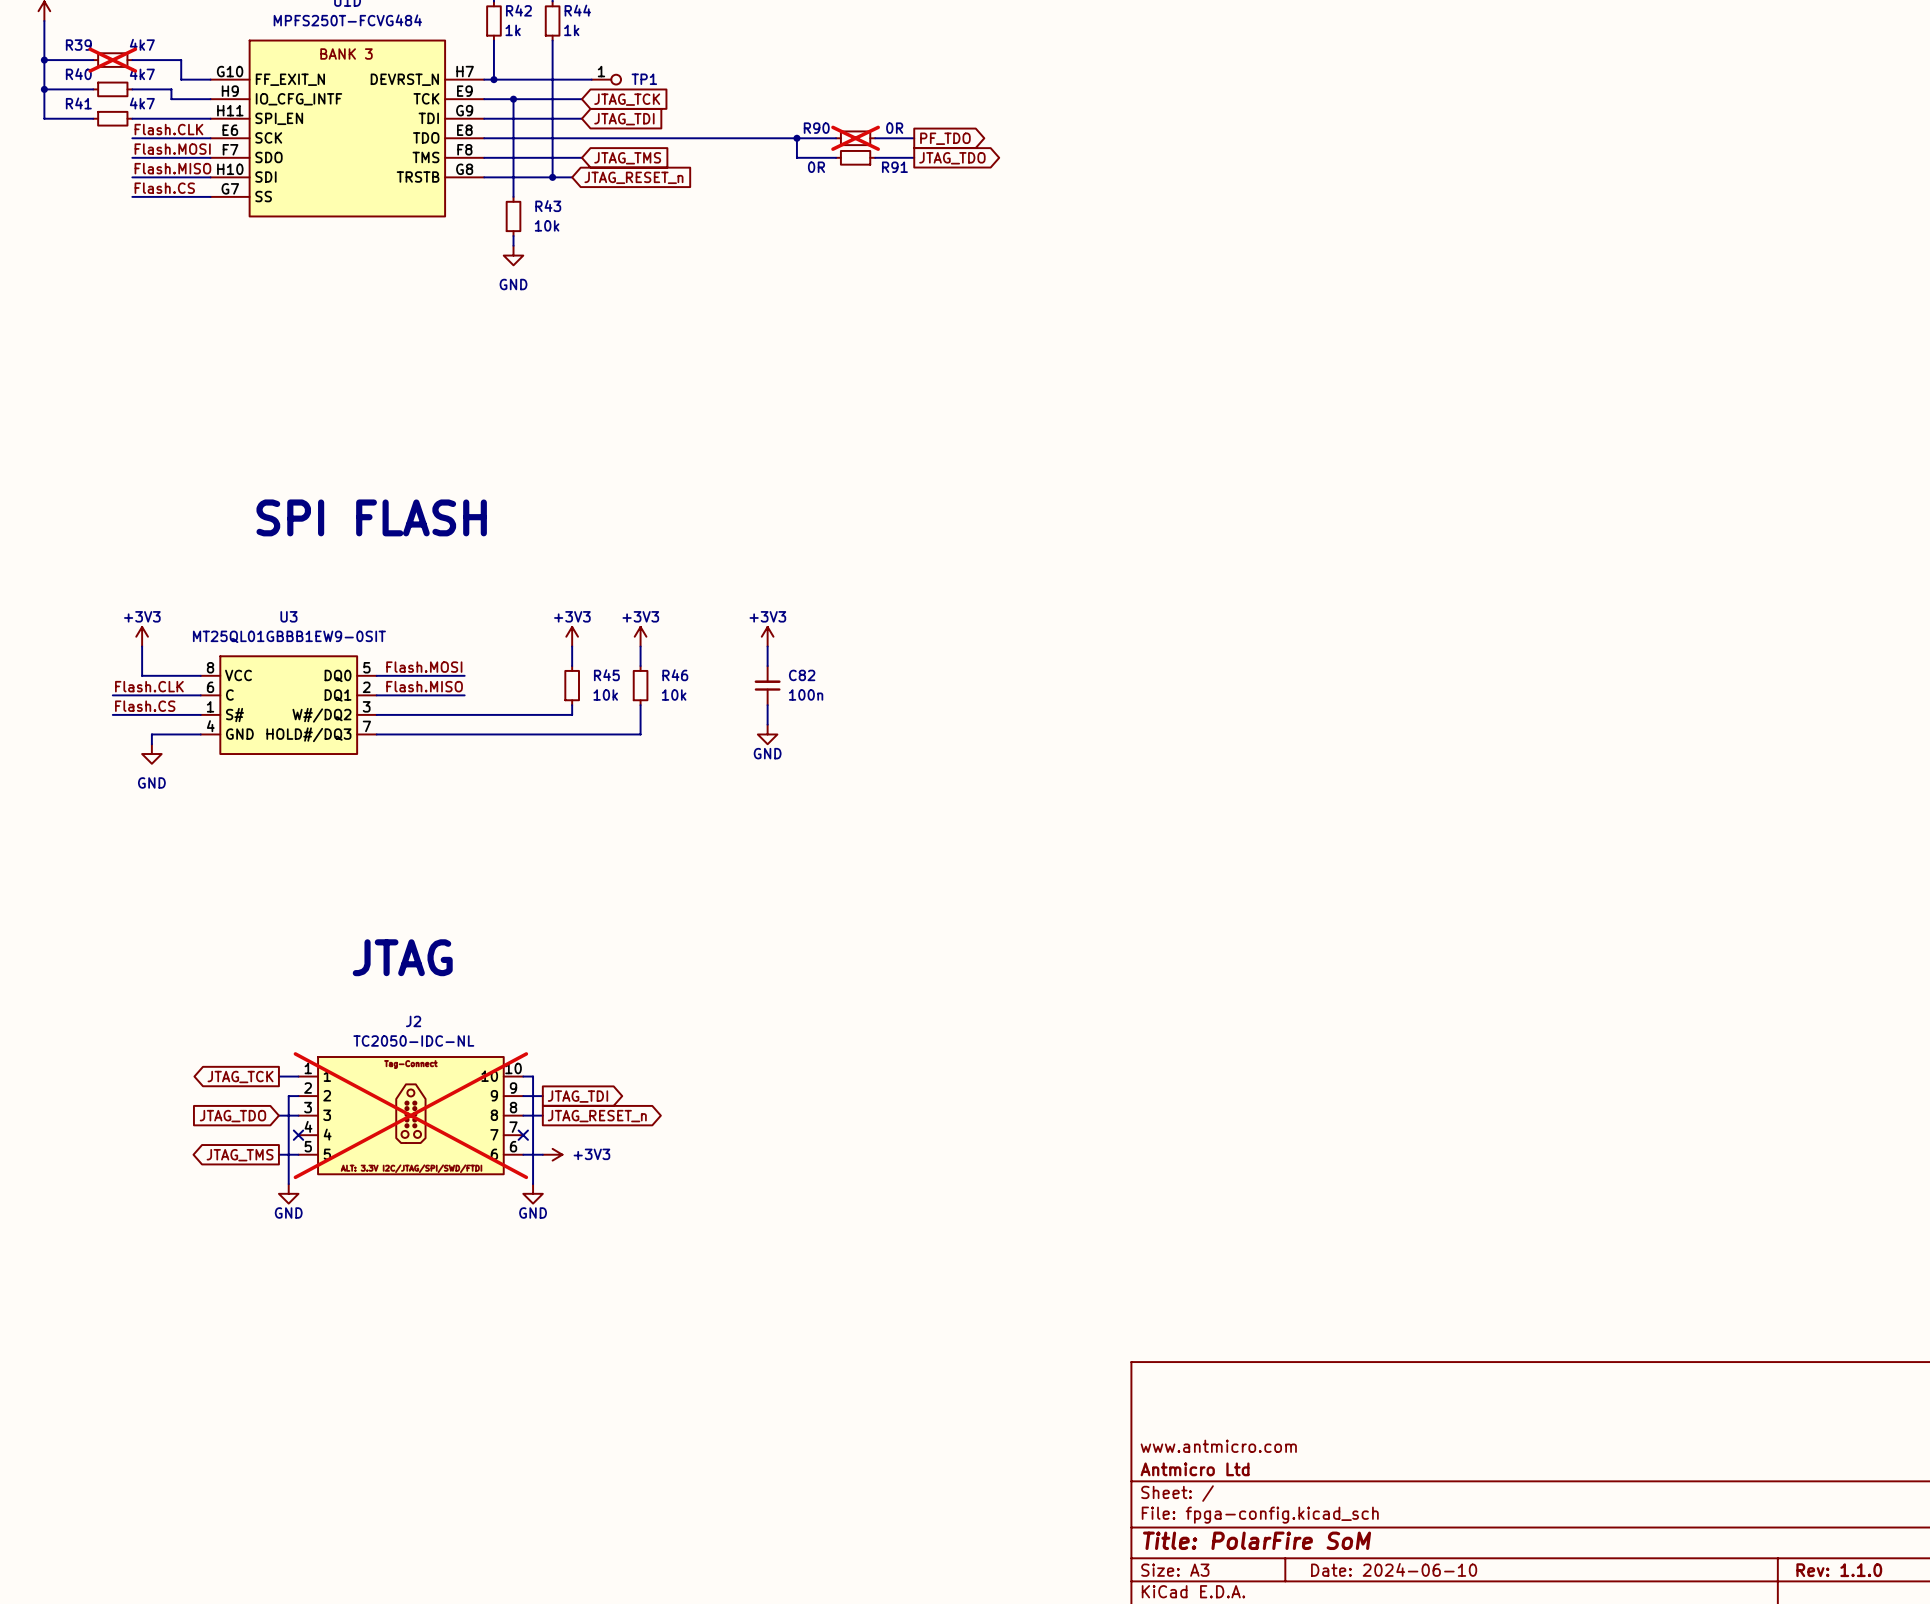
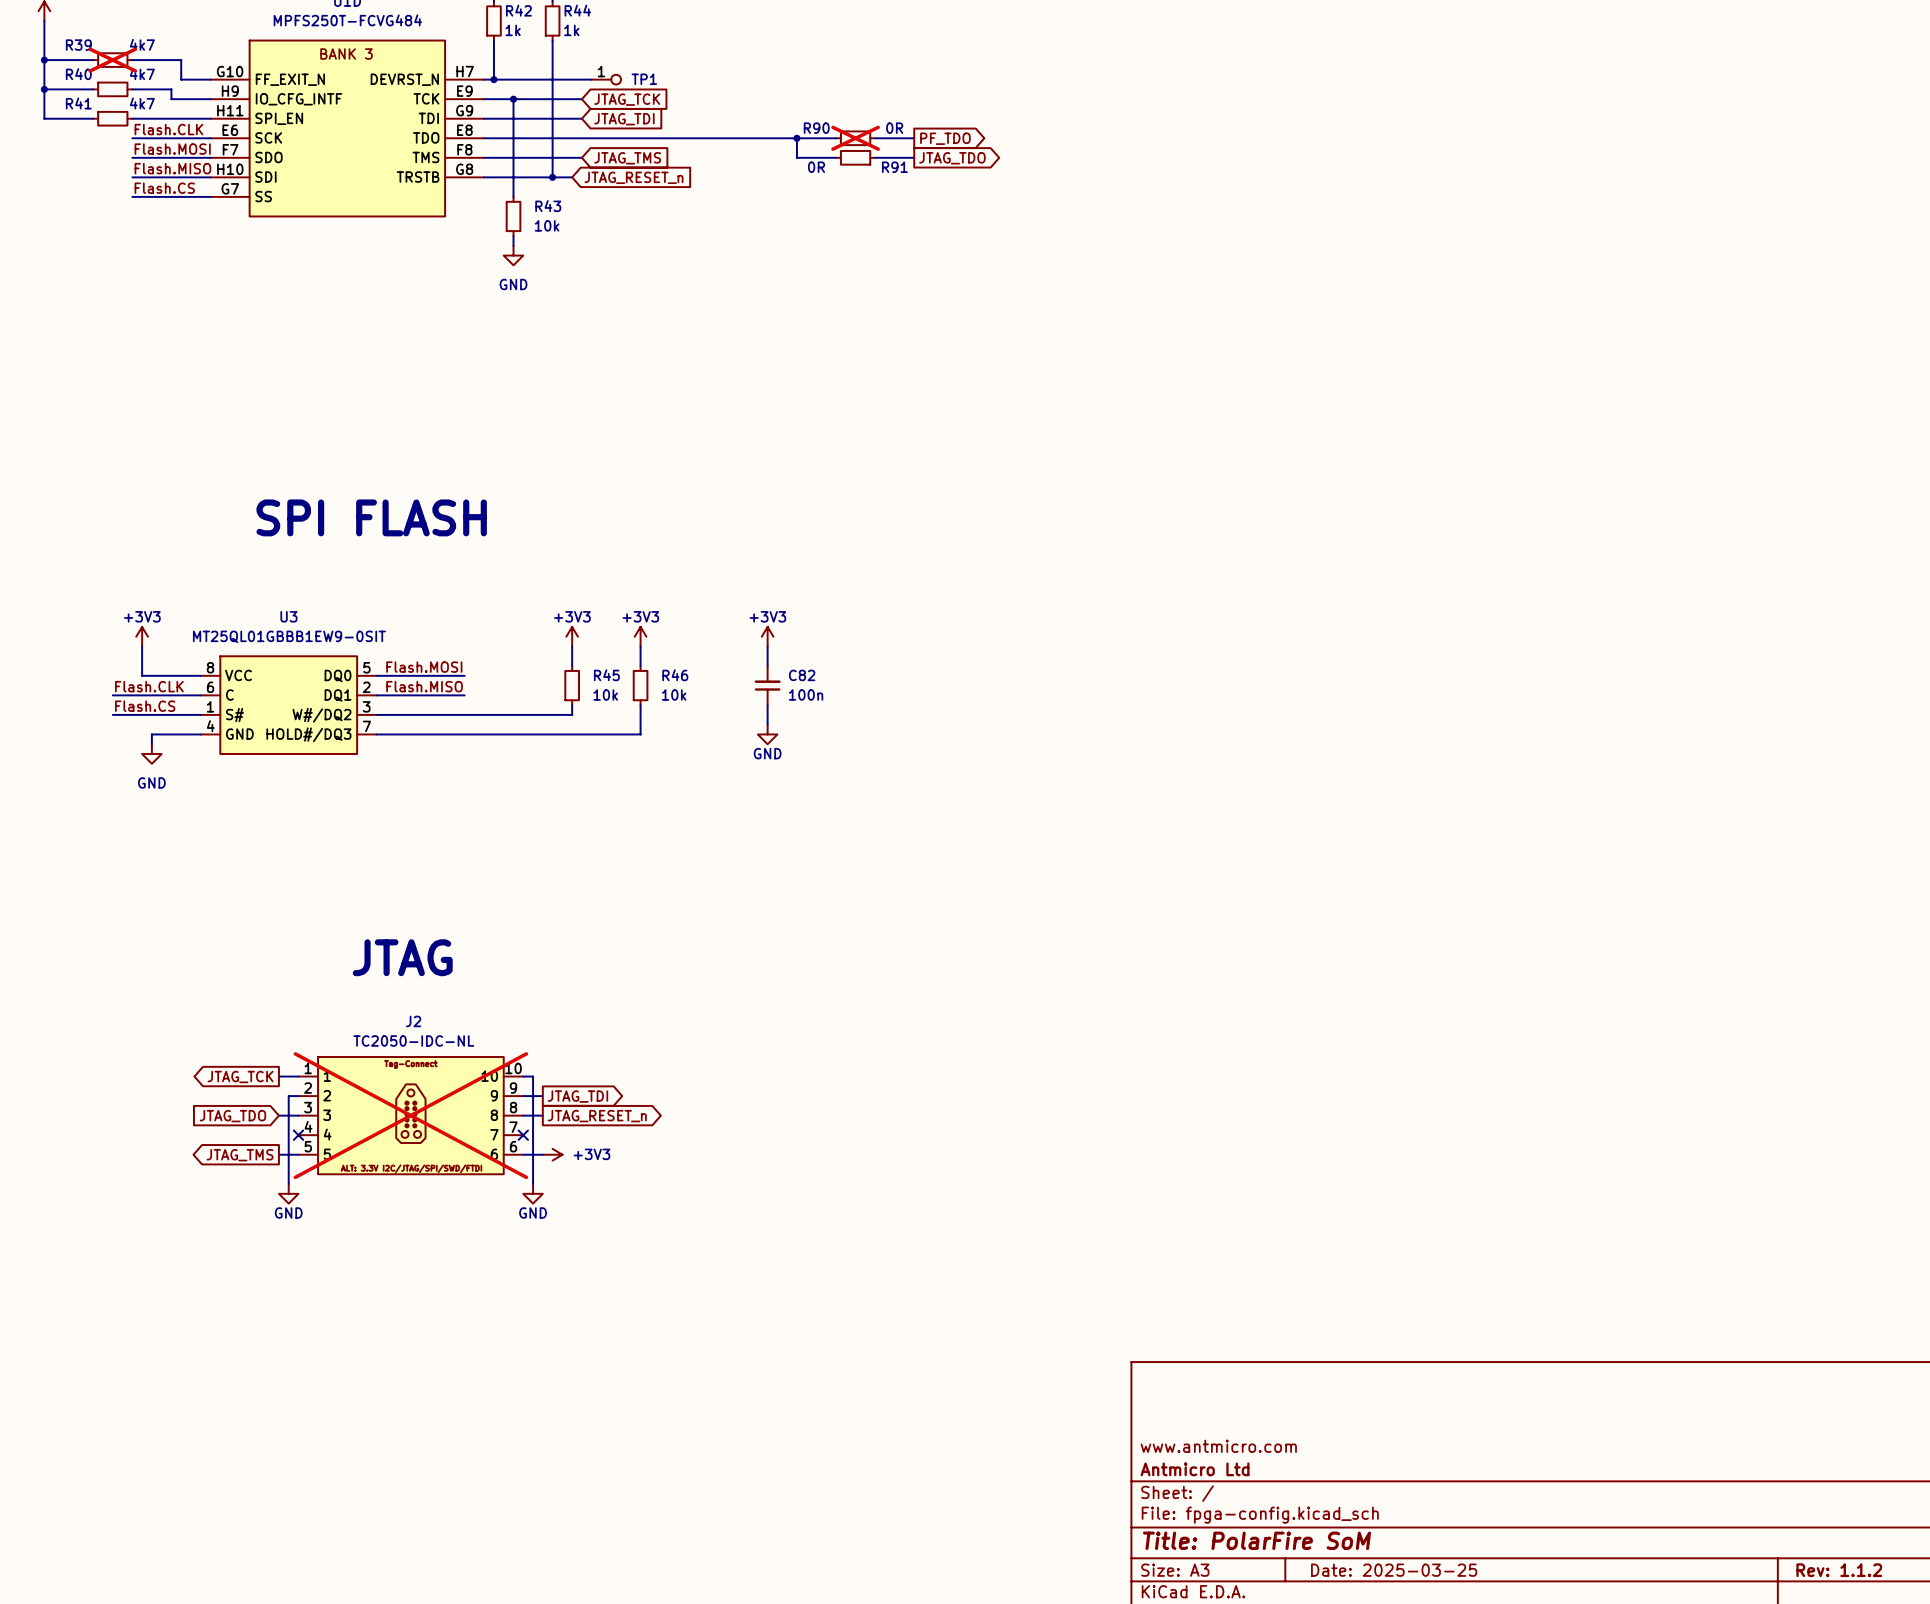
title block: Date: 2024-06-10 (1394, 1569) -> Date: 2025-03-25 (1394, 1570)
title block: Rev: 1.1.0 (1839, 1570) -> Rev: 1.1.2 (1839, 1570)

